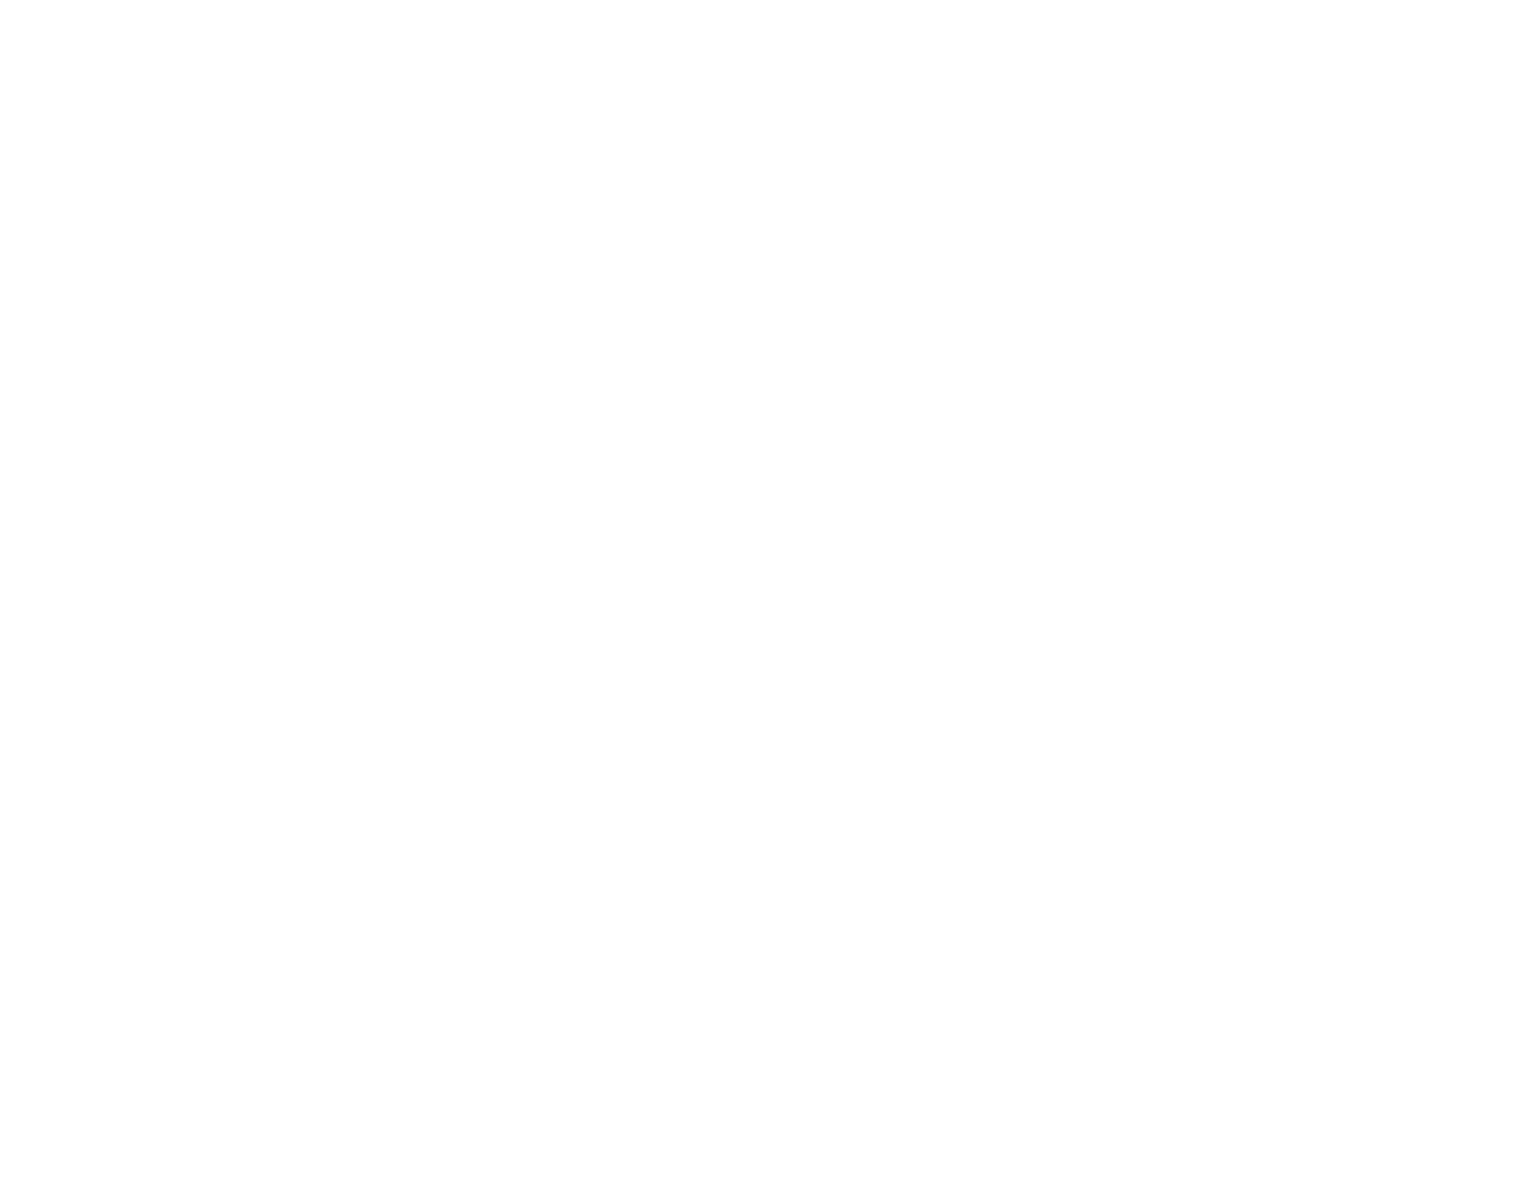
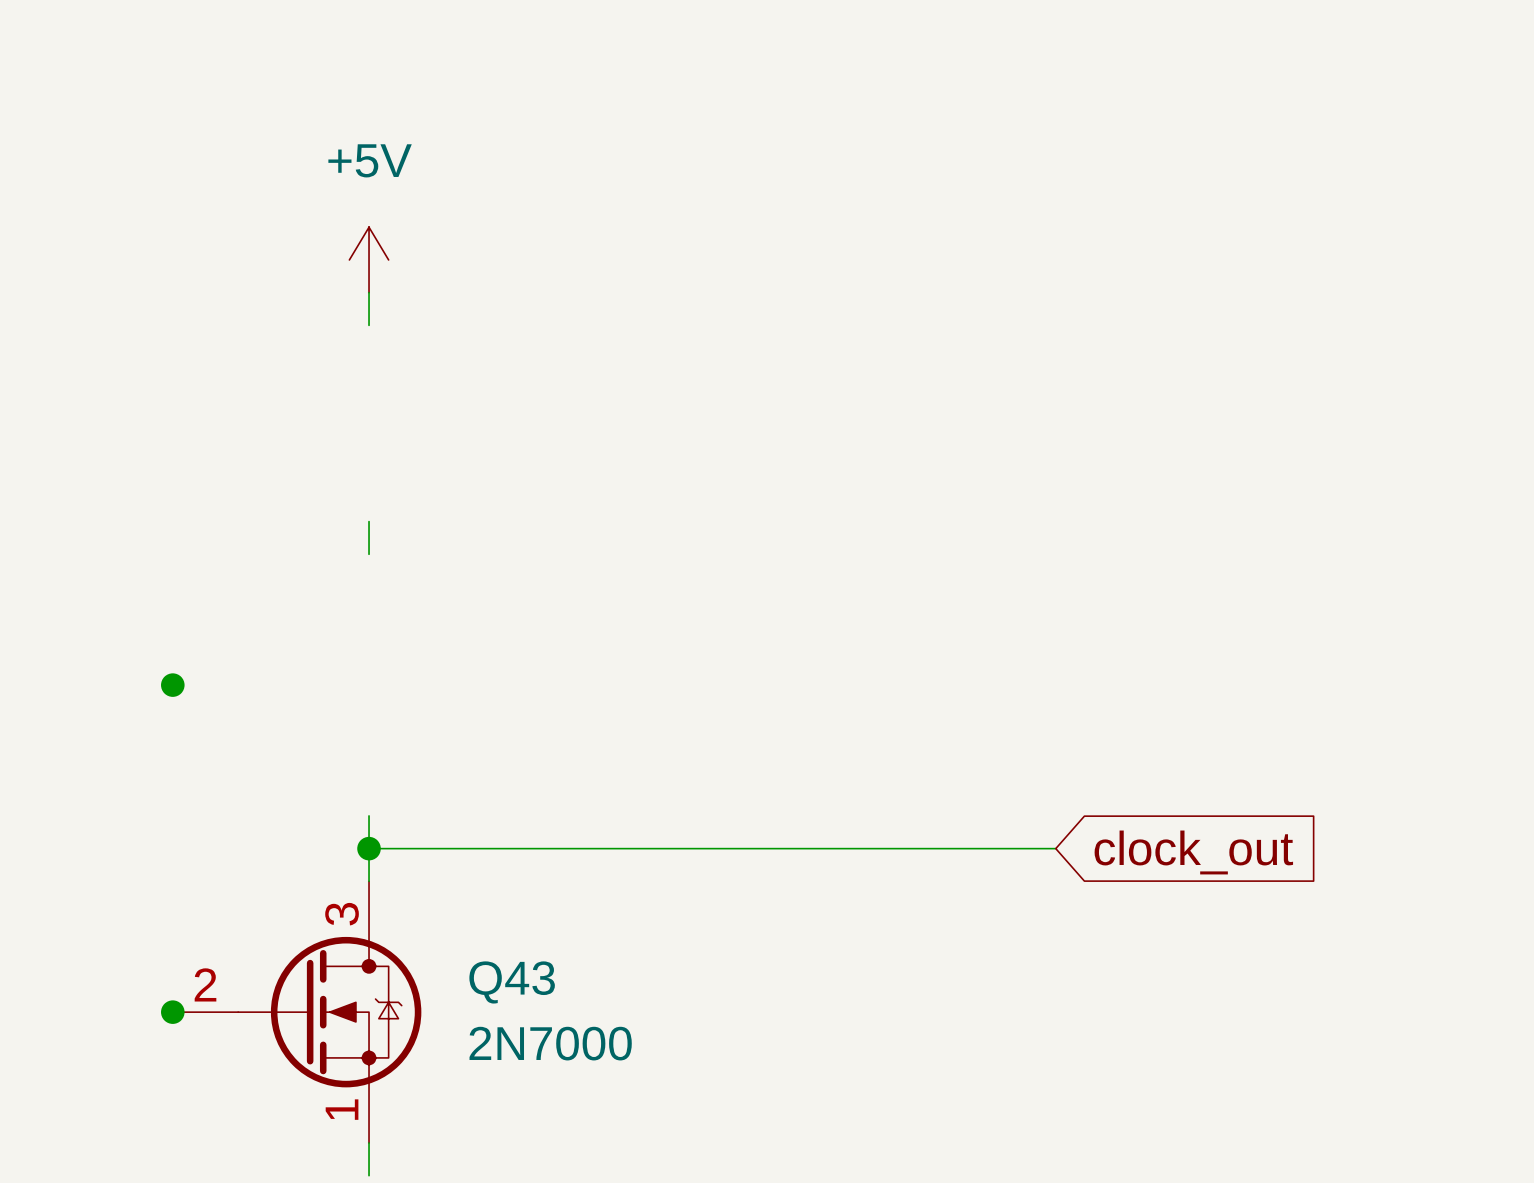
power symbol: none -> +5V (369, 259)
wire: none -> (369, 292) (369, 325)
wire: none -> (369, 521) (369, 554)
junction: none -> (172, 685)
wire: none -> (369, 815) (369, 881)
wire: none -> (369, 848) (1055, 848)
junction: none -> (369, 848)
global label: none -> clock_out (1193, 852)
junction: none -> (172, 1012)
Q43: none -> 2N7000 (297, 1012)
wire: none -> (369, 1142) (369, 1175)

